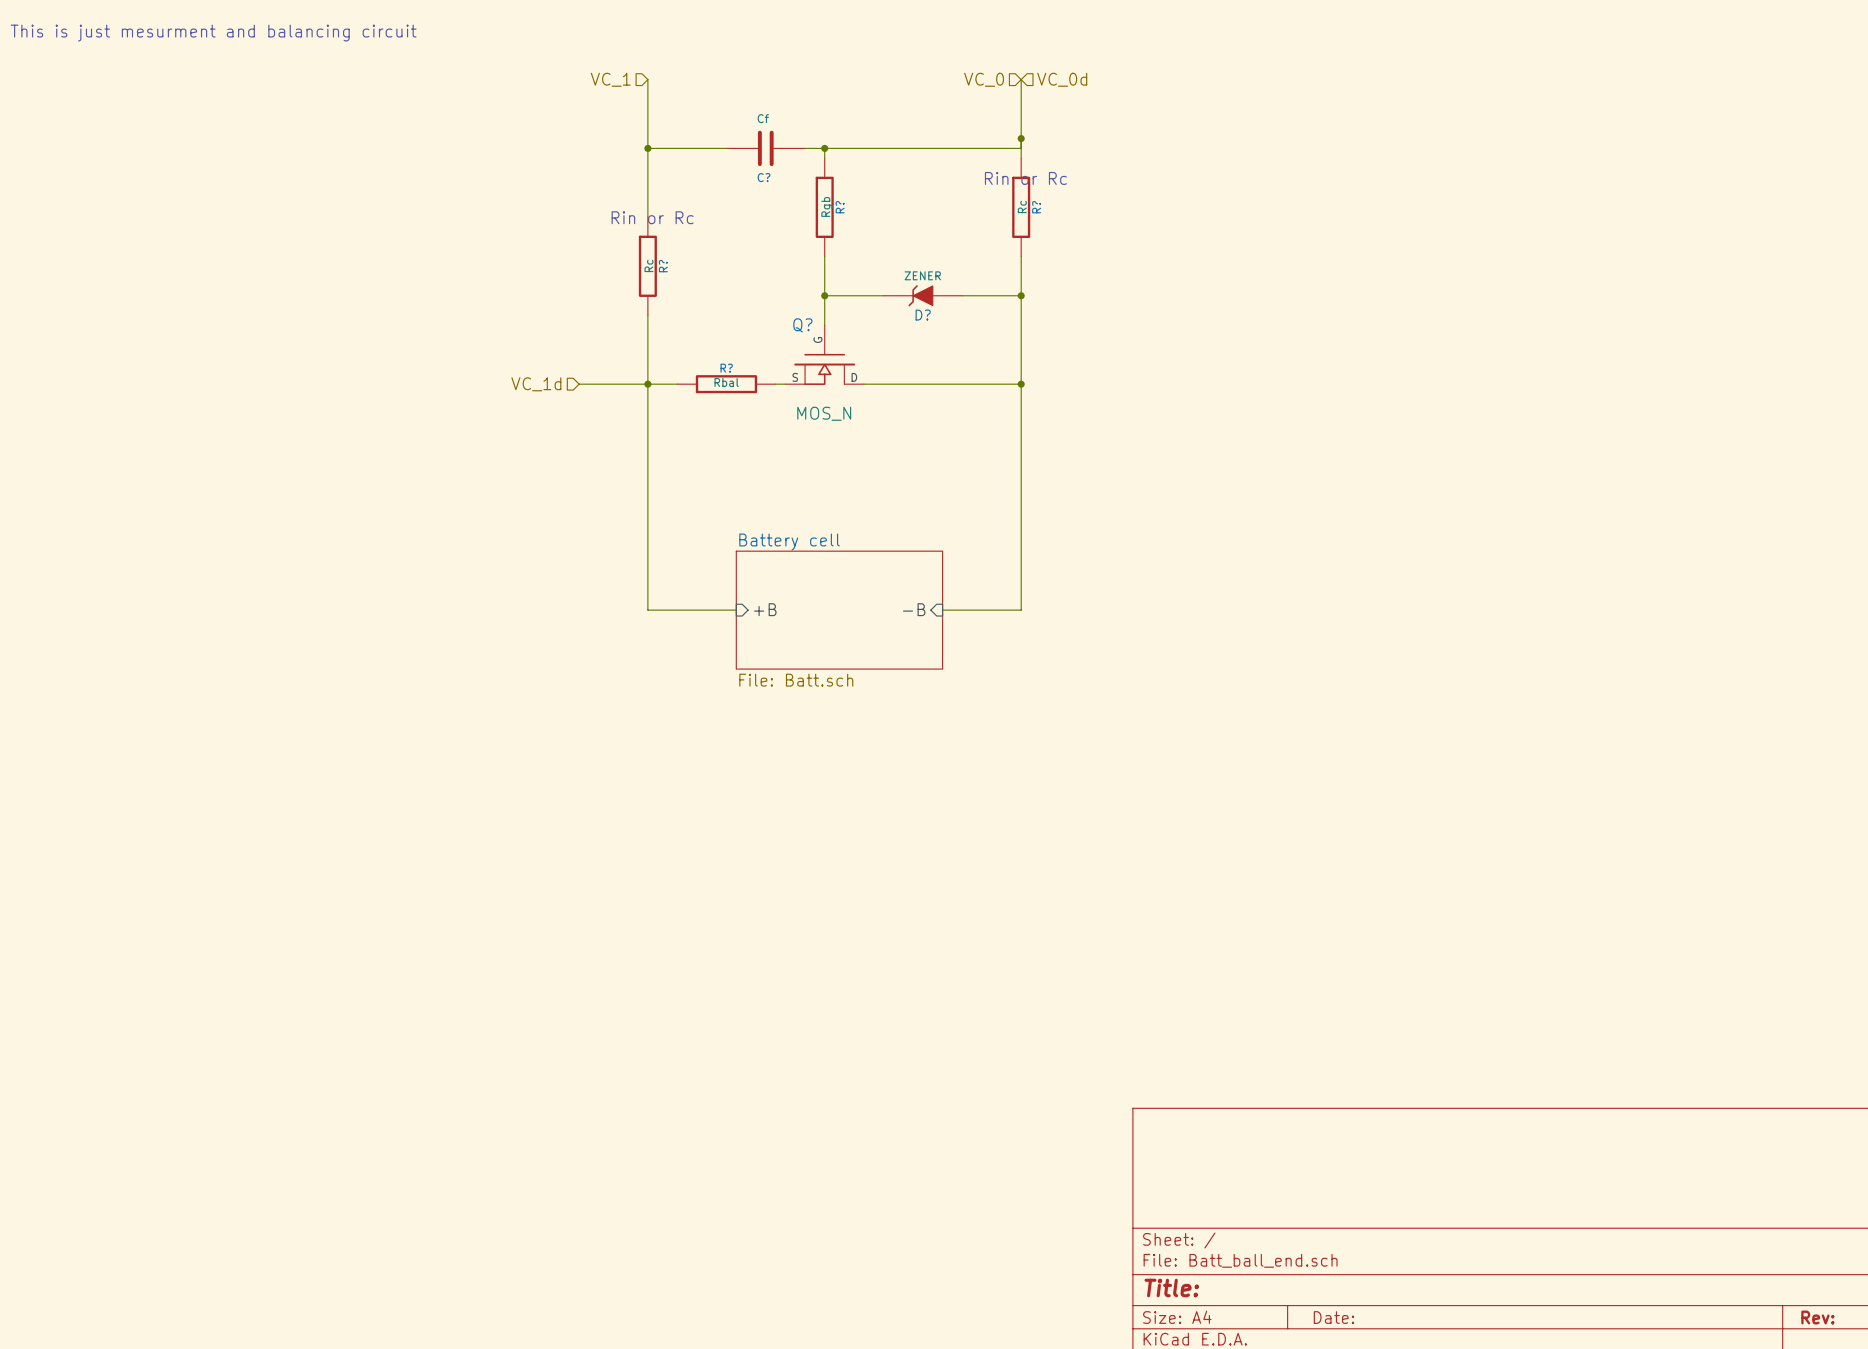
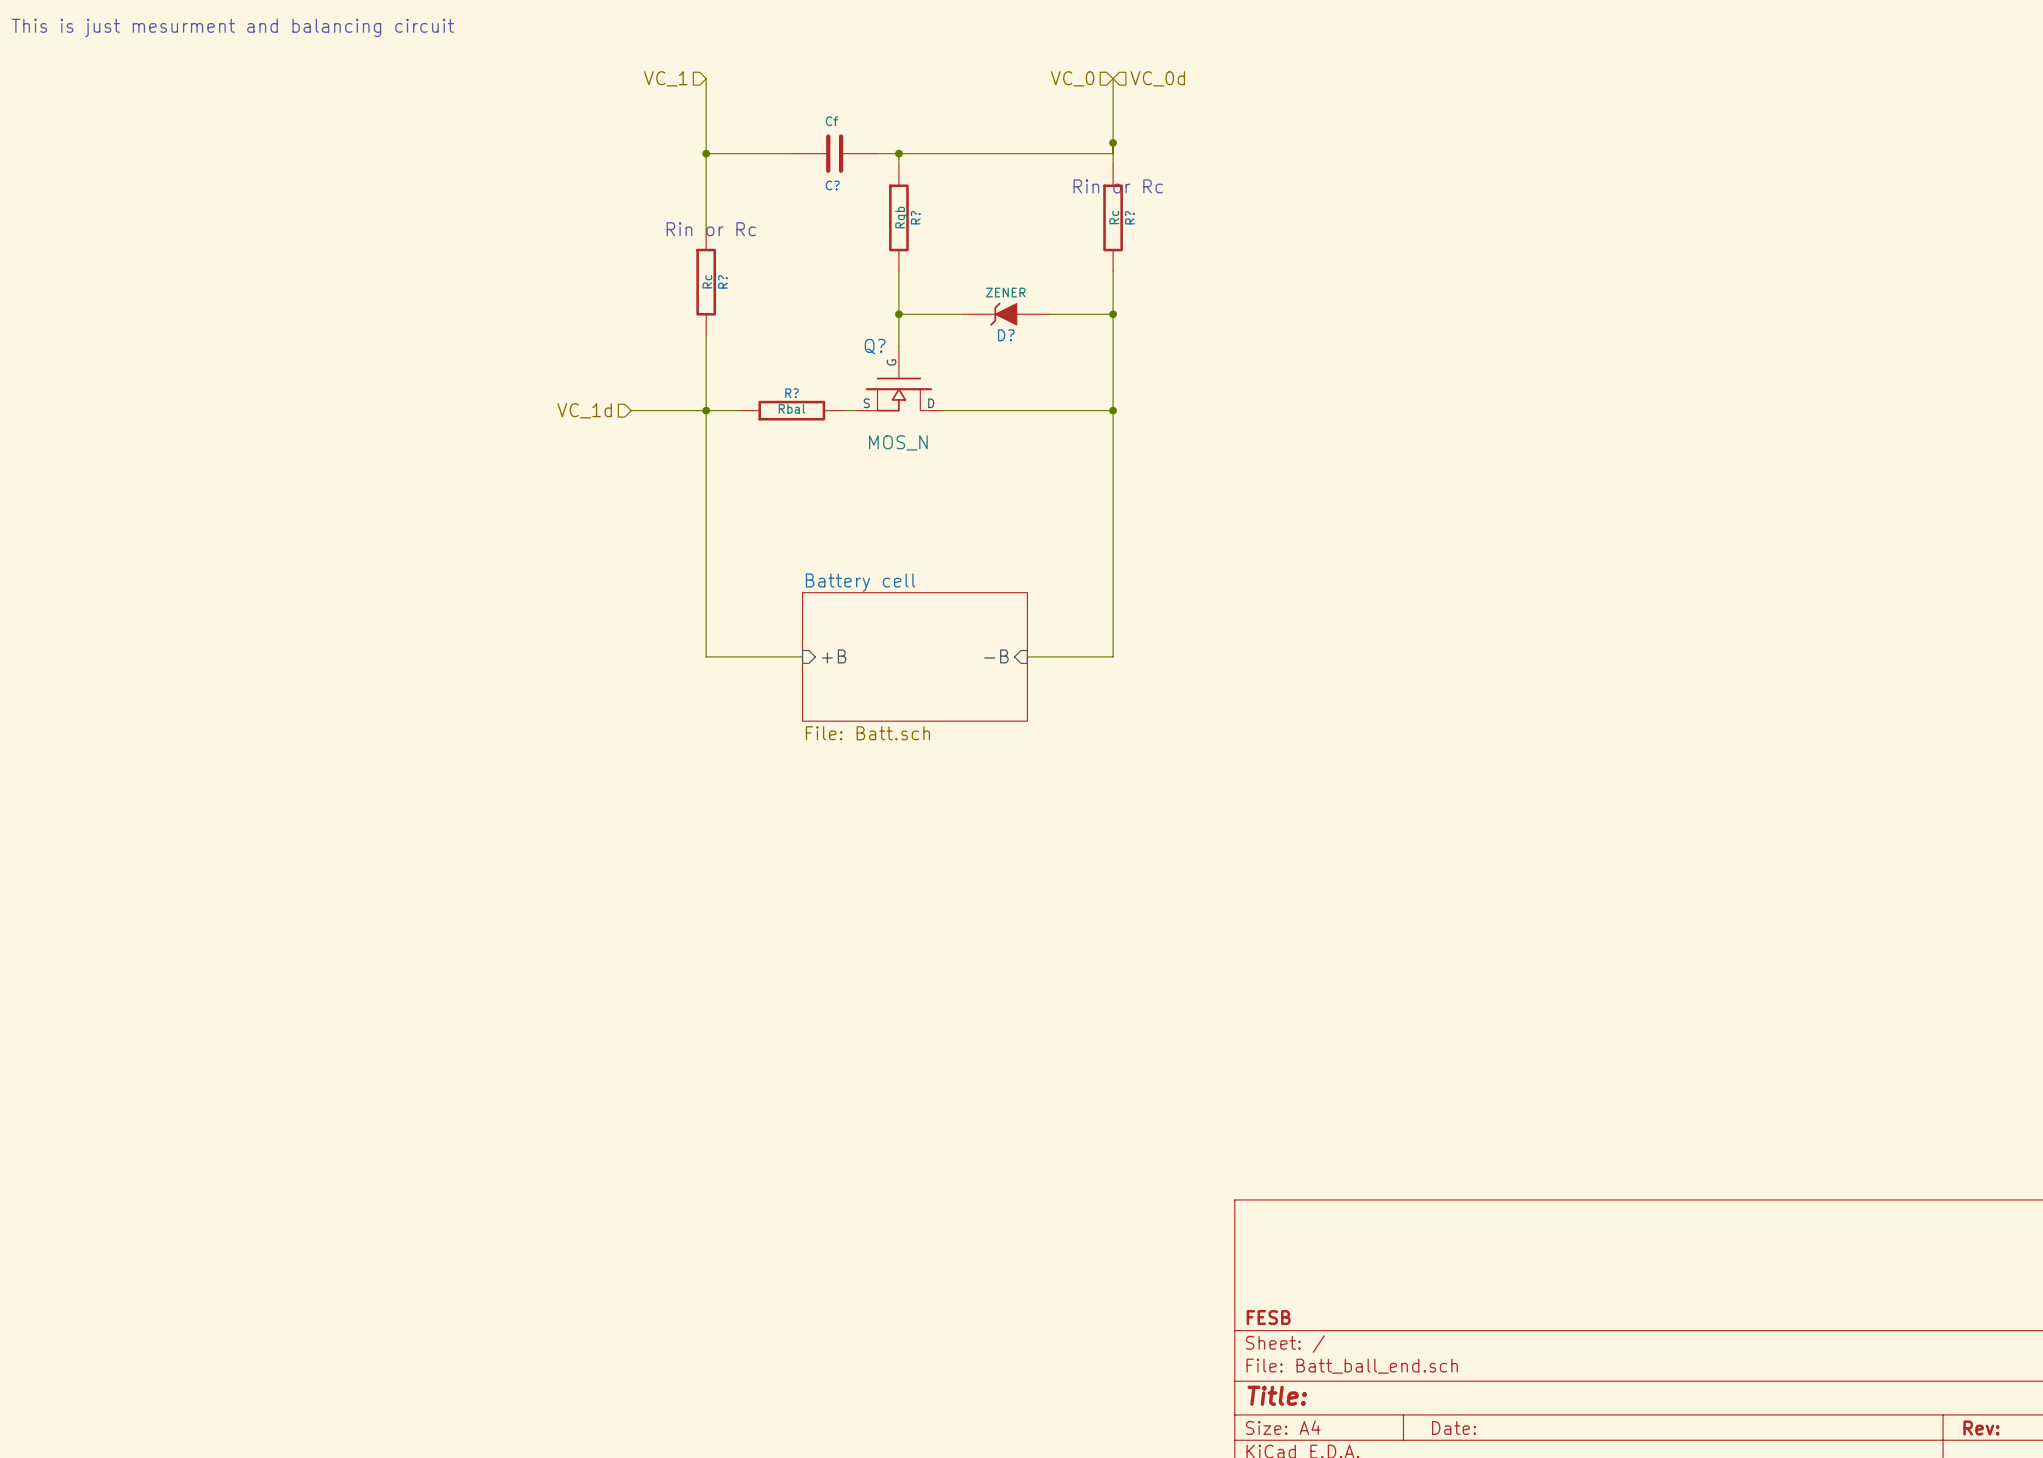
title block: none -> FESB (1268, 1317)

